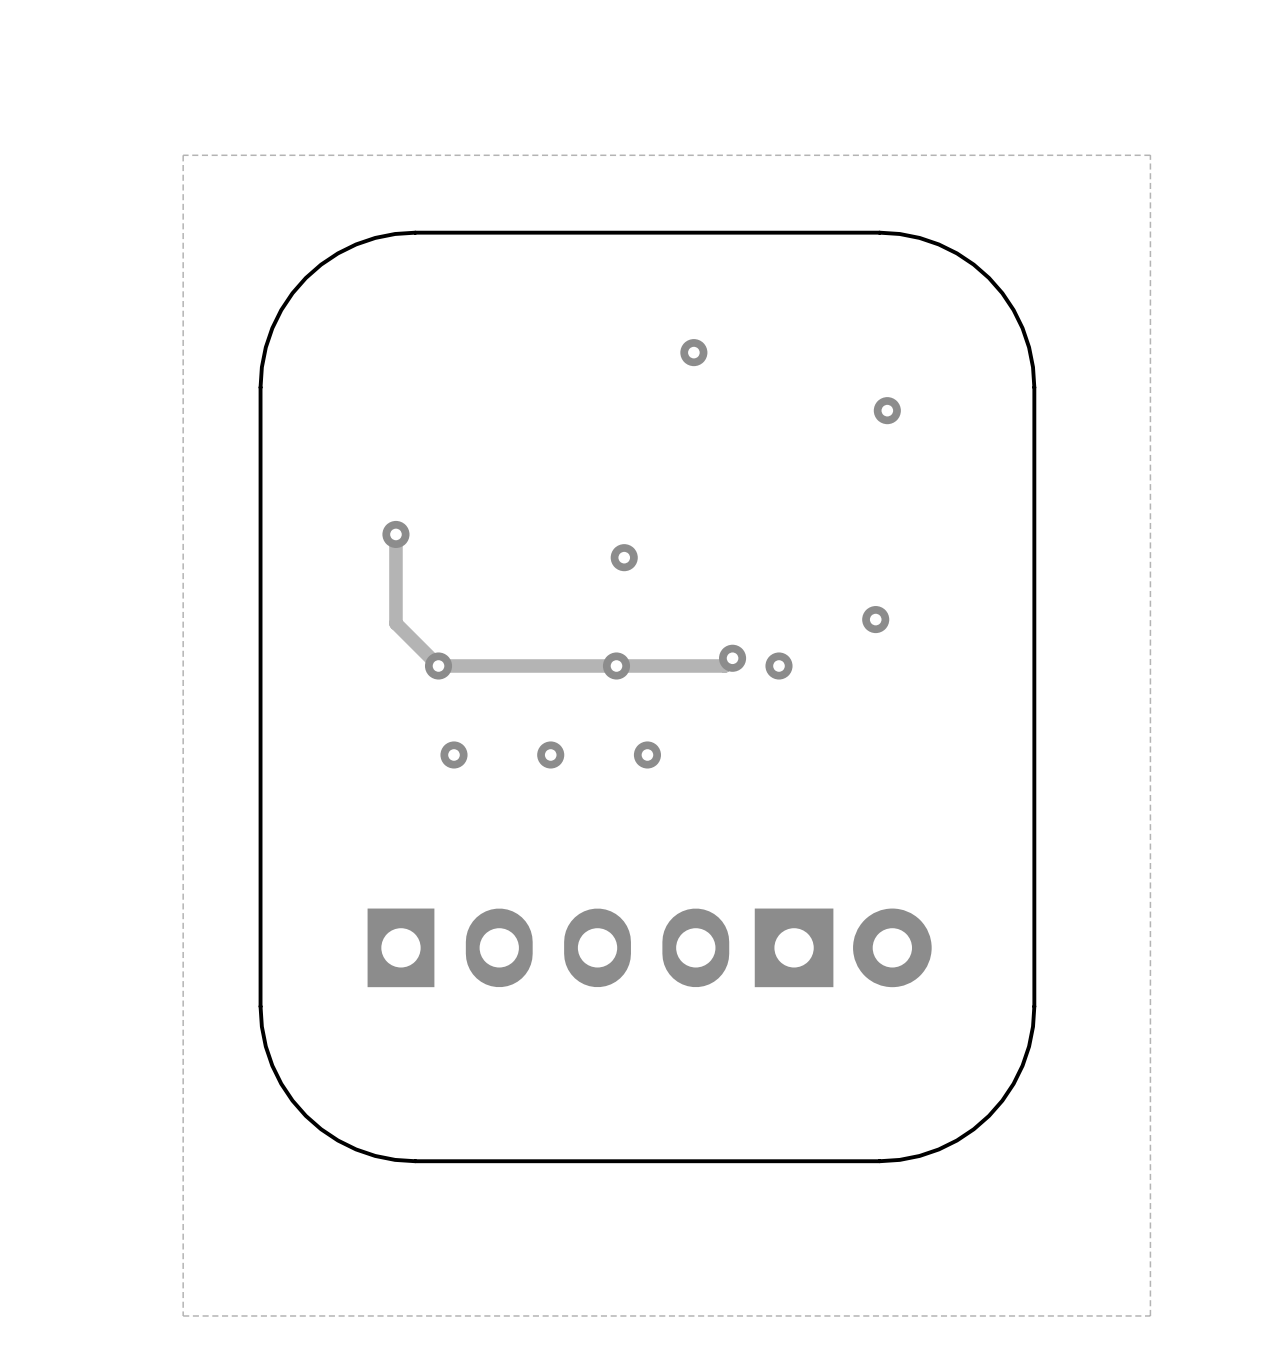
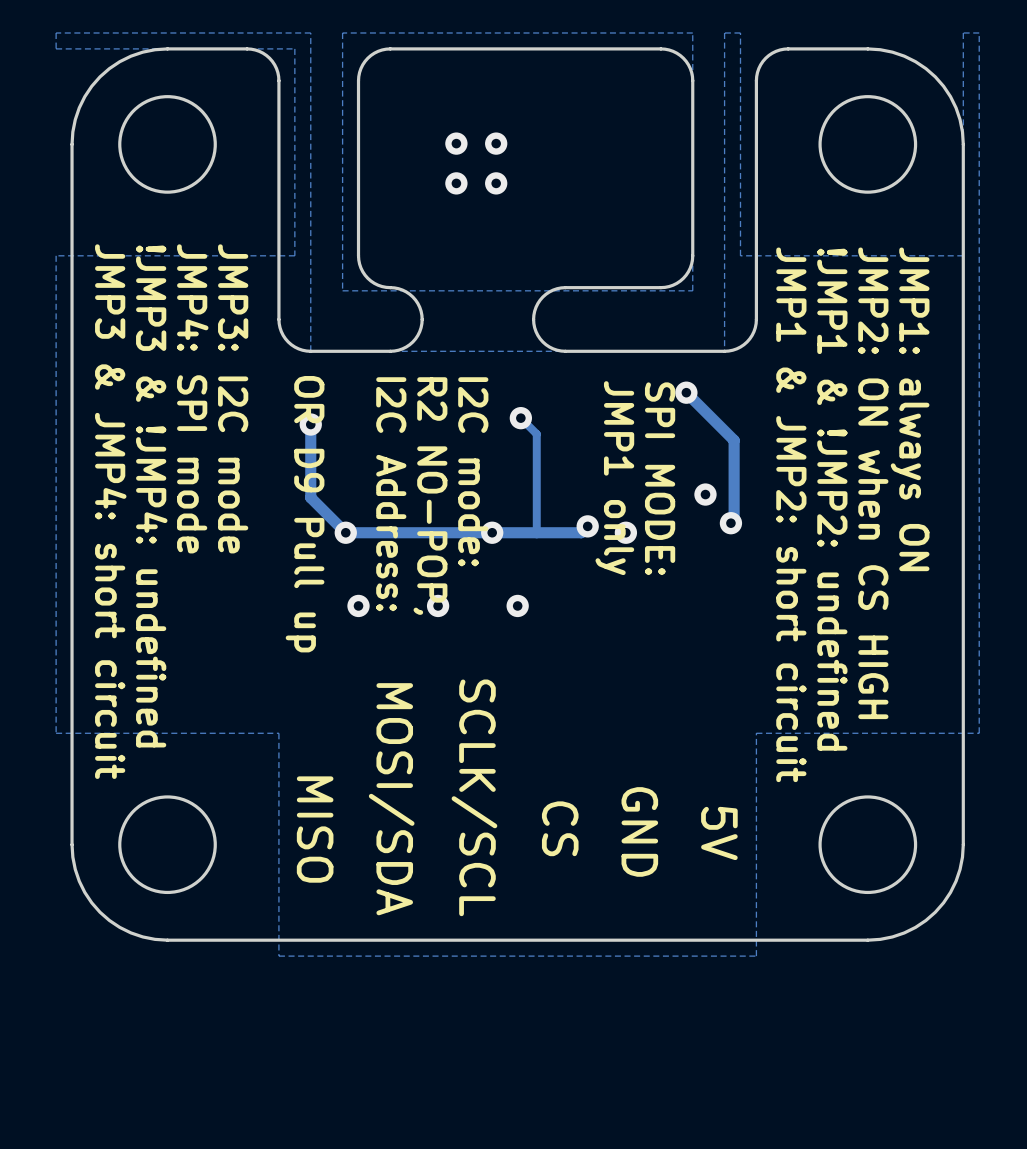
zone outline: none -> (692, 32) (692, 290) (342, 290) (342, 32) (692, 32)
round board edge: none -> [118, 95, 217, 194]
round board edge: none -> [818, 95, 918, 194]
zone outline: (1150, 155) (1150, 1315) (183, 1315) (183, 155) (1150, 155) -> (979, 32) (979, 733) (756, 733) (756, 956) (278, 956) (278, 733) (56, 733) (56, 255) (294, 255) (294, 48) (56, 48) (56, 32) (310, 32) (310, 351) (724, 351) (724, 32) (740, 32) (740, 255) (963, 255) (963, 32) (979, 32)
via: none -> (456, 143)
via: none -> (496, 143)
via: none -> (456, 183)
via: none -> (496, 183)
via: (693, 352) -> none
via position: (887, 410) -> (686, 392)
track: none -> (686, 392) (734, 440) (734, 520) (730, 523)
text: none -> JMP4: SPI mode (192, 398)
text: none -> JMP3: I2C mode (233, 398)
text: none -> JMP1: always ON (910, 409)
track: none -> (520, 418) (536, 434) (536, 532)
via position: (624, 557) -> (520, 418)
text: none -> I2C mode: (473, 471)
text: none -> JMP1 only (614, 478)
text: none -> SPI MODE: (660, 478)
text: none -> JMP2: ON when CS HIGH (873, 483)
text: none -> I2C Address: (391, 494)
text: none -> !JMP3 & !JMP4: undefined (151, 496)
text: none -> R2 NO-POP, (430, 496)
text: none -> !JMP1 & !JMP2: undefined (832, 499)
text: none -> JMP3 & JMP4: short circuit (110, 511)
text: none -> OR D9 Pull up (305, 514)
text: none -> JMP1 & JMP2: short circuit (791, 514)
via: none -> (730, 523)
part: (548, 947) -> none
part: (843, 947) -> none
round board edge: none -> [118, 795, 217, 895]
round board edge: none -> [818, 795, 918, 895]
text: none -> SCLK/SCL (474, 797)
text: none -> MOSI/SDA (391, 799)
text: none -> CS (560, 828)
text: none -> MISO (315, 829)
text: none -> GND (639, 831)
text: none -> 5V (719, 833)
board edge: (879, 1161) (919, 1155) (938, 1149) (973, 1129) (989, 1115) (1013, 1083) (1022, 1065) (1029, 1046) (1034, 1006) (1034, 387) (1029, 347) (1022, 328) (1002, 293) (973, 264) (956, 253) (919, 237) (879, 232) (395, 233) (356, 244) (337, 253) (305, 277) (281, 310) (265, 347) (260, 387) (261, 1026) (272, 1065) (281, 1083) (292, 1100) (321, 1129) (356, 1149) (375, 1155) (415, 1161) -> (708, 940) (867, 940) (892, 936) (915, 927) (935, 912) (950, 892) (960, 869) (963, 844) (962, 131) (956, 107) (943, 86) (925, 68) (915, 61) (892, 52) (867, 48) (784, 49) (772, 53) (760, 64) (756, 80) (756, 323) (753, 331) (747, 341) (736, 348) (724, 351) (561, 351) (549, 347) (542, 341) (537, 335) (533, 323) (533, 315) (537, 303) (546, 294) (557, 288) (665, 287) (676, 283) (688, 271) (692, 255) (692, 76) (686, 61) (673, 51) (660, 48) (390, 48) (378, 51) (367, 58) (360, 68) (358, 80) (359, 264) (365, 275) (374, 283) (398, 288) (409, 294) (417, 303) (421, 315) (421, 327) (415, 338) (406, 347) (394, 351) (306, 351) (291, 344) (281, 331) (278, 319) (278, 80) (274, 64) (266, 55) (259, 51) (247, 48) (167, 48) (142, 52) (119, 61) (109, 68) (100, 76) (84, 96) (75, 119) (72, 144) (72, 844) (75, 869) (84, 892) (100, 912) (119, 927) (142, 936) (167, 940) (326, 940)

